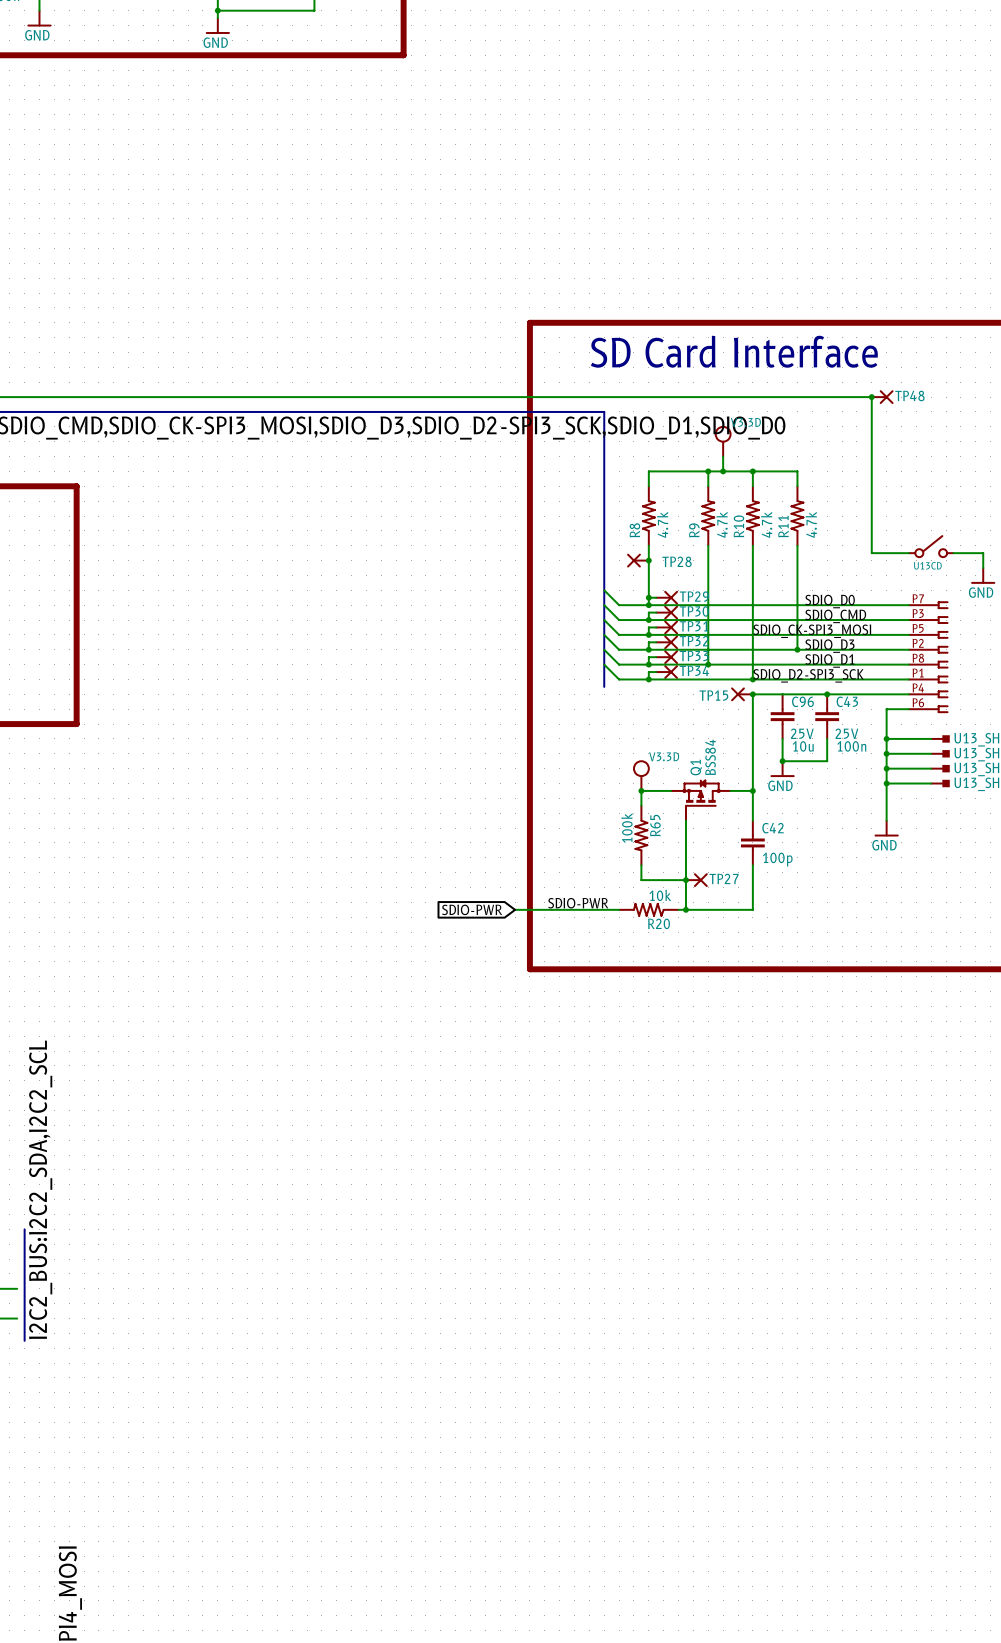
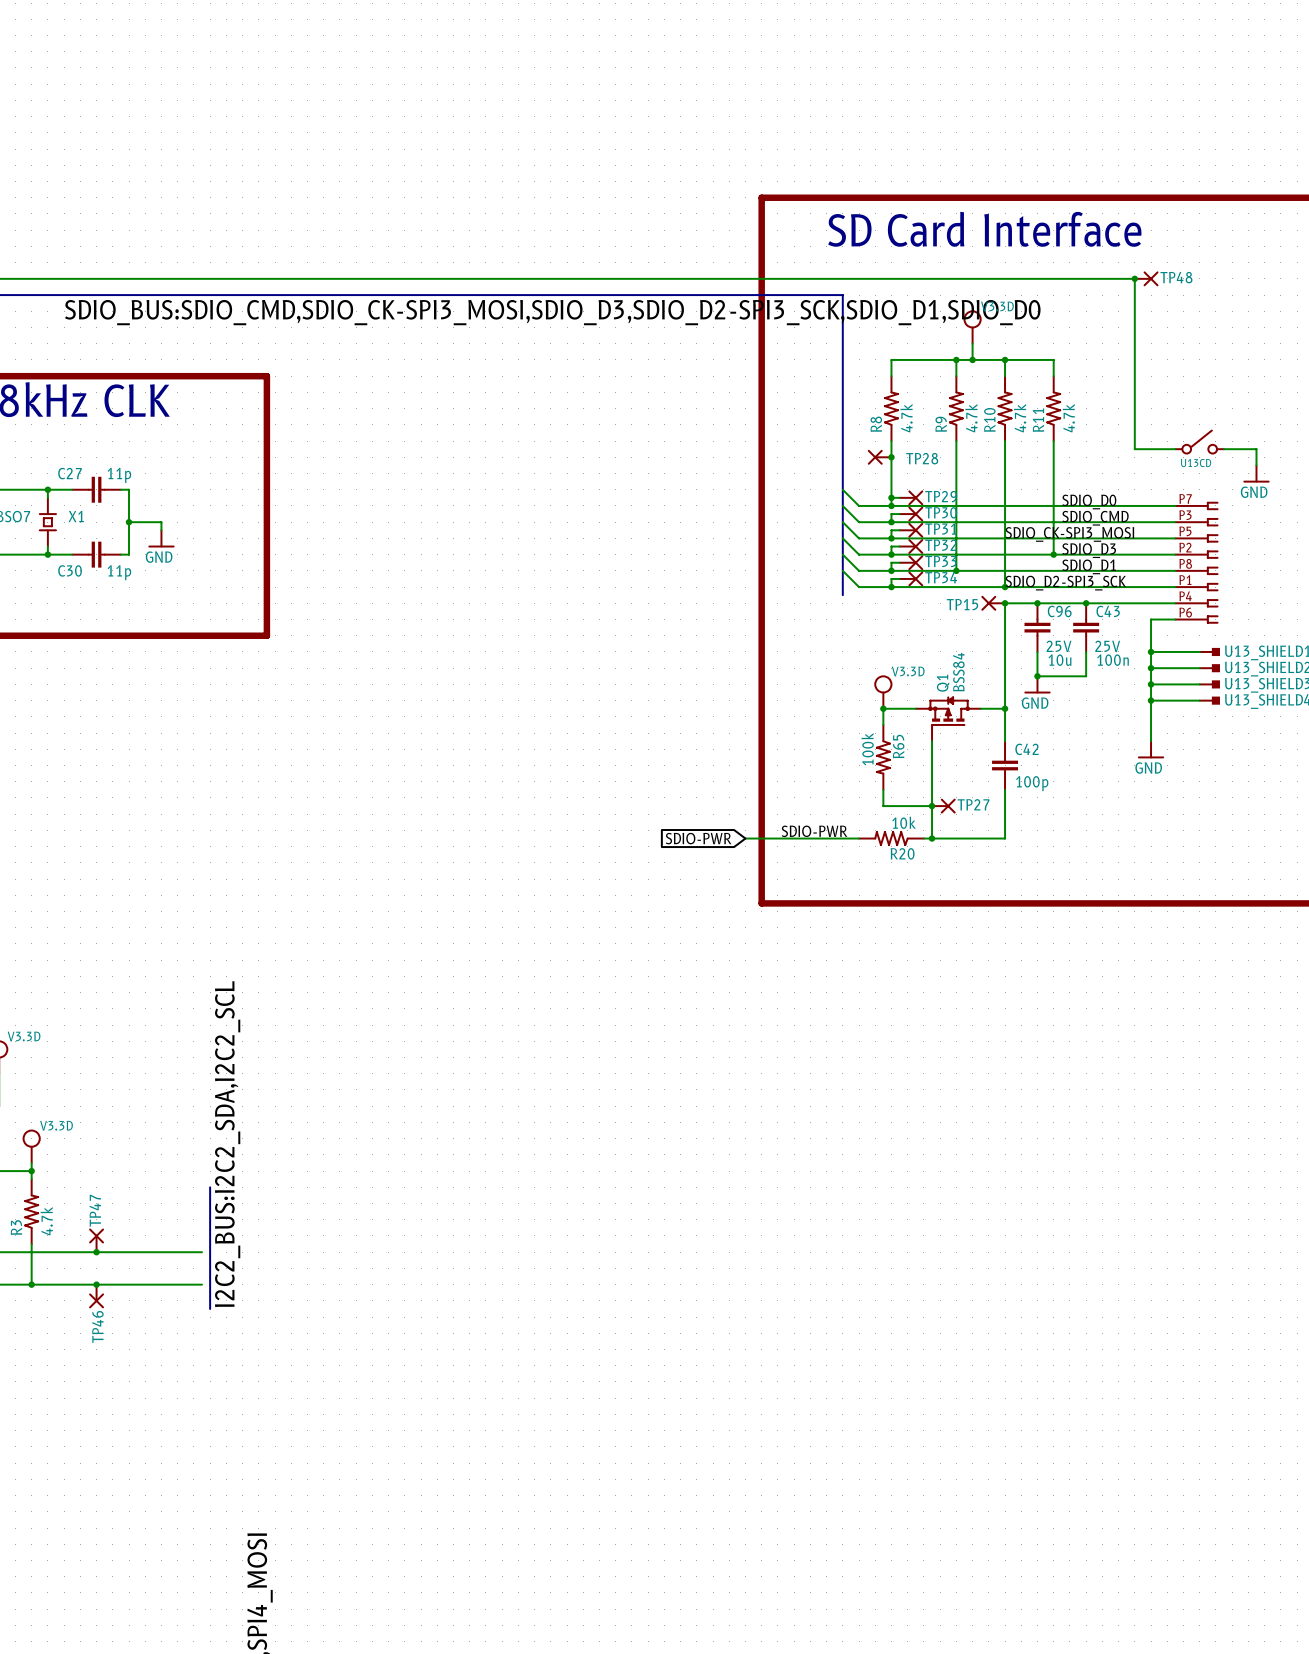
junction: none -> (1037, 603)

